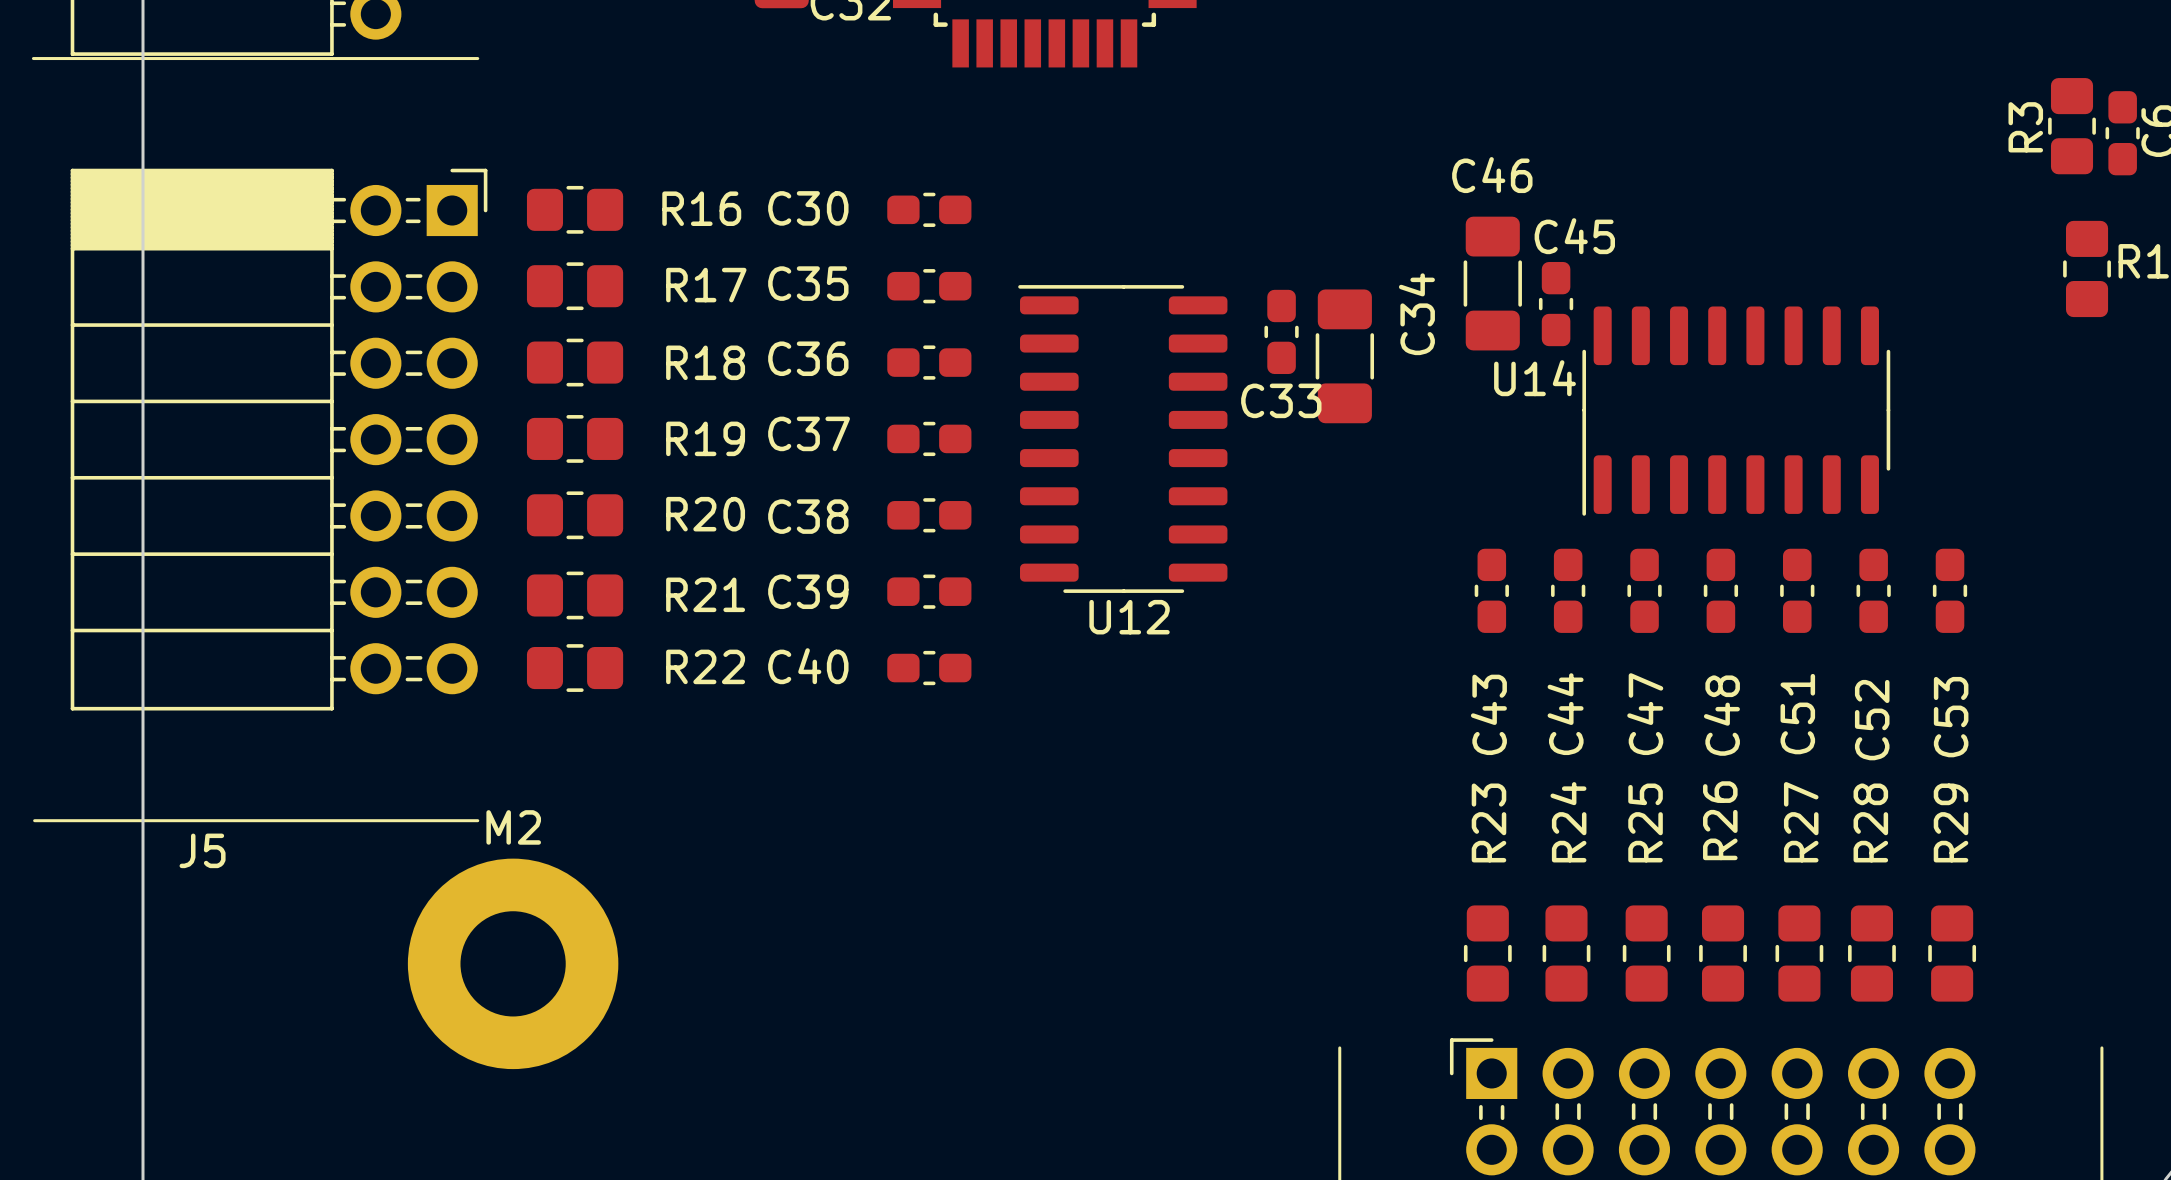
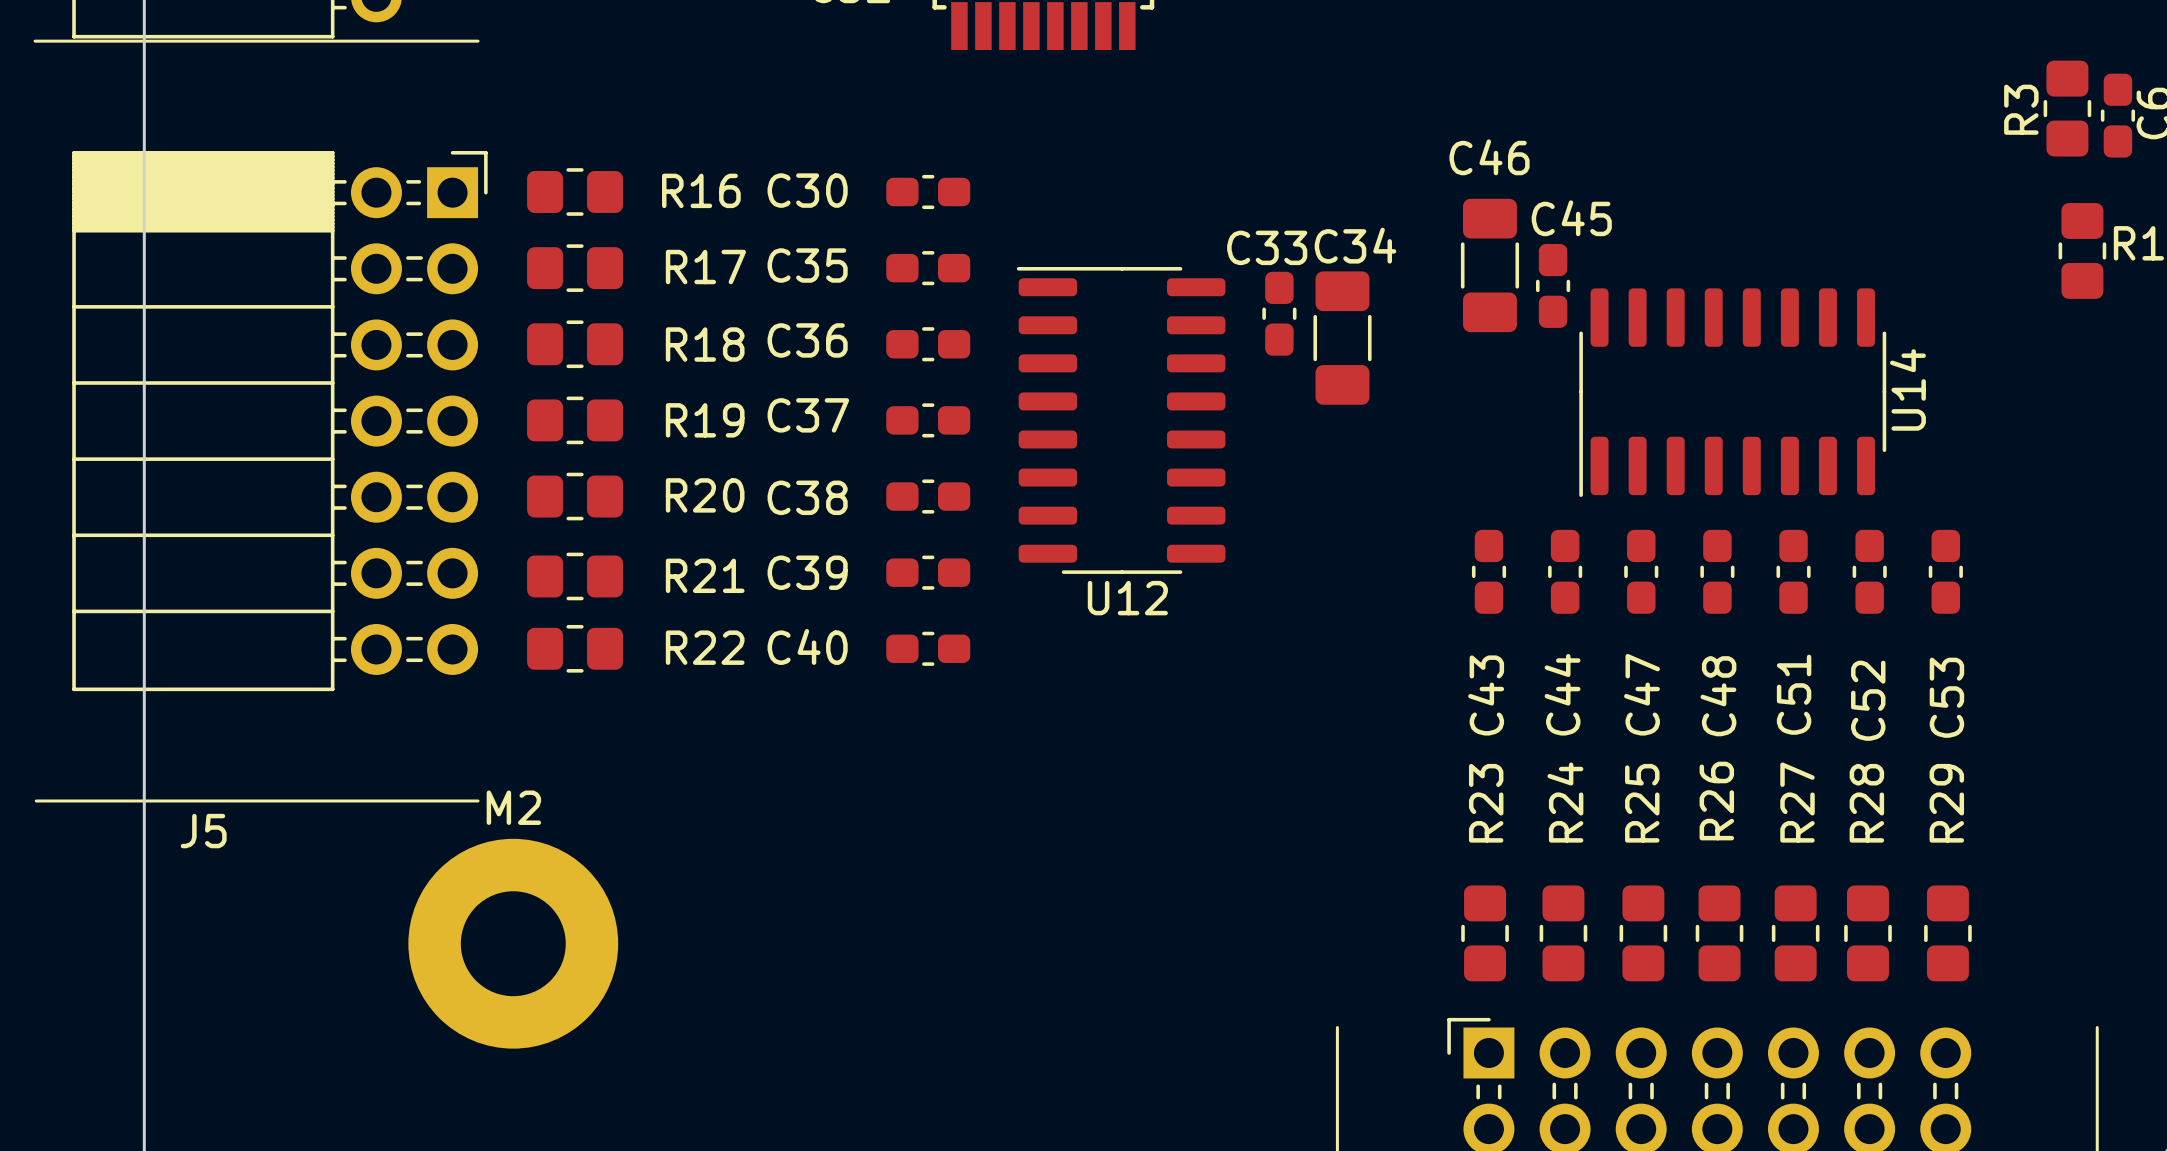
C34 name rotation: 0° (1416, 314) -> 90° clockwise (1355, 245)
U14 name rotation: 0° (1535, 378) -> 90° counterclockwise (1907, 389)
U14 name position: U14 (1535, 378) -> U14 (1907, 389)
C33 name position: C33 (1281, 400) -> C33 (1267, 247)

